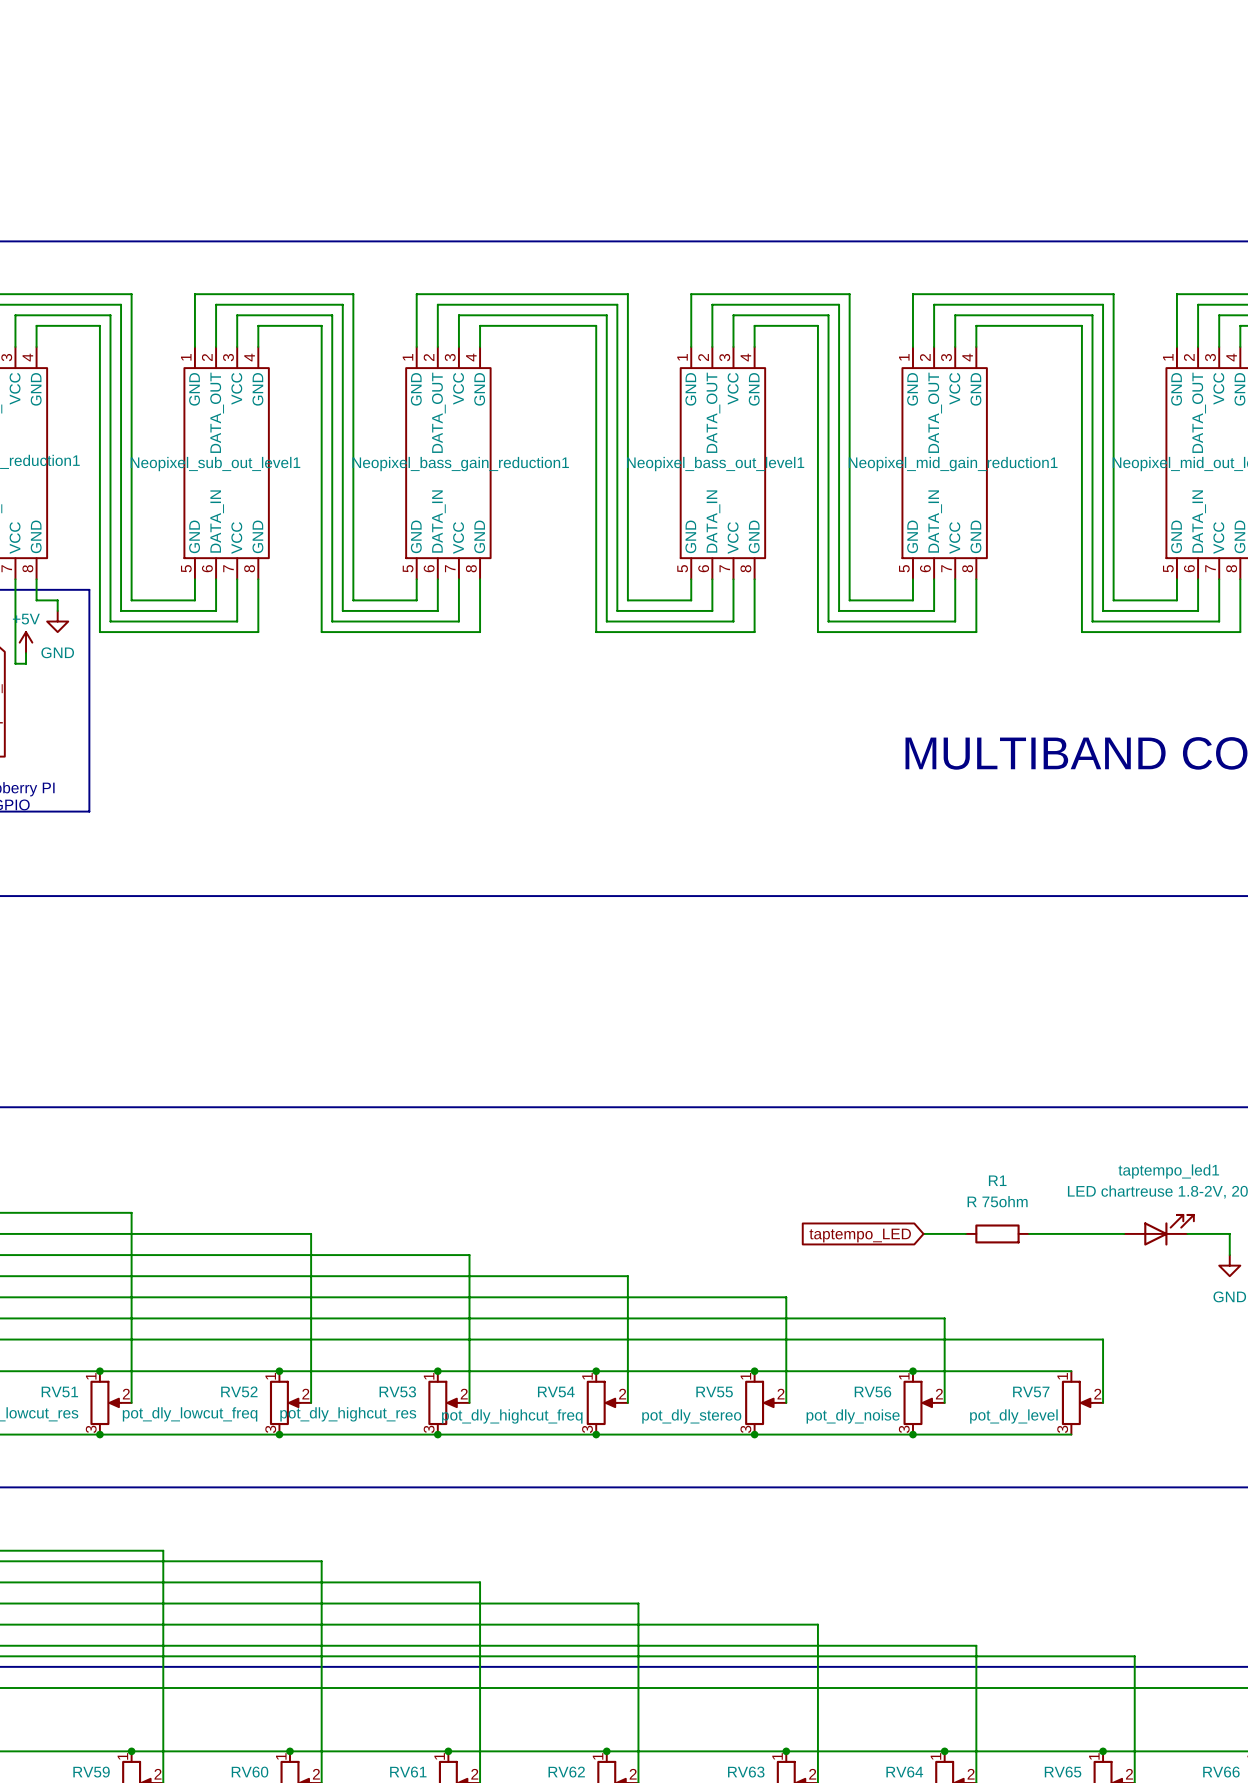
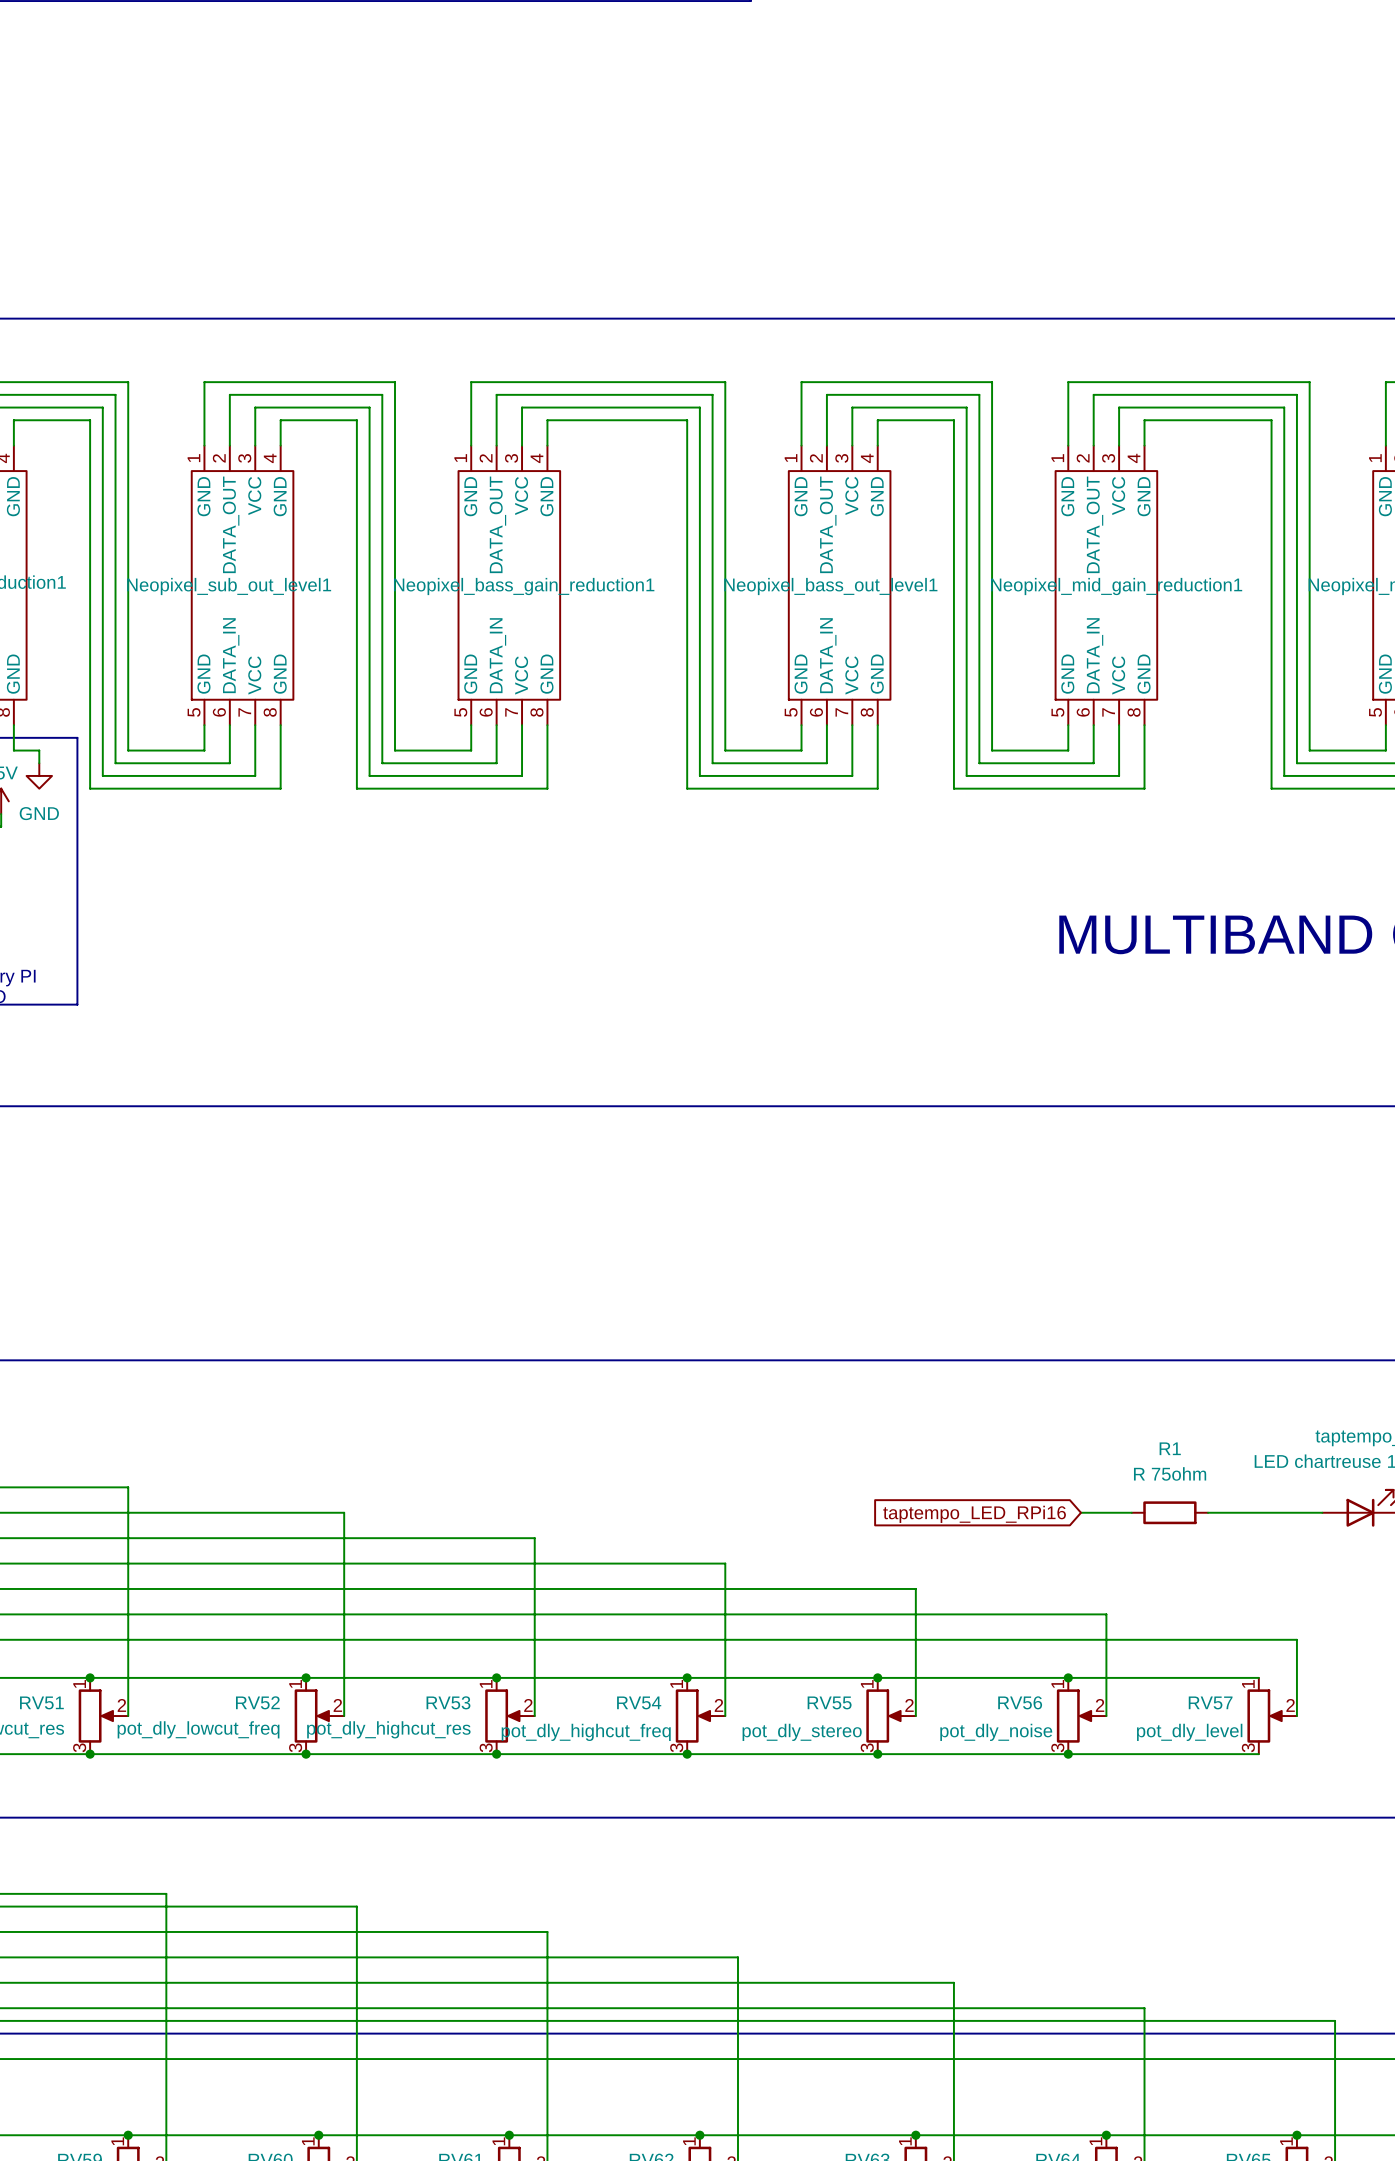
global label: taptempo_LED (860, 1235) -> taptempo_LED_RPi16 (974, 1514)

